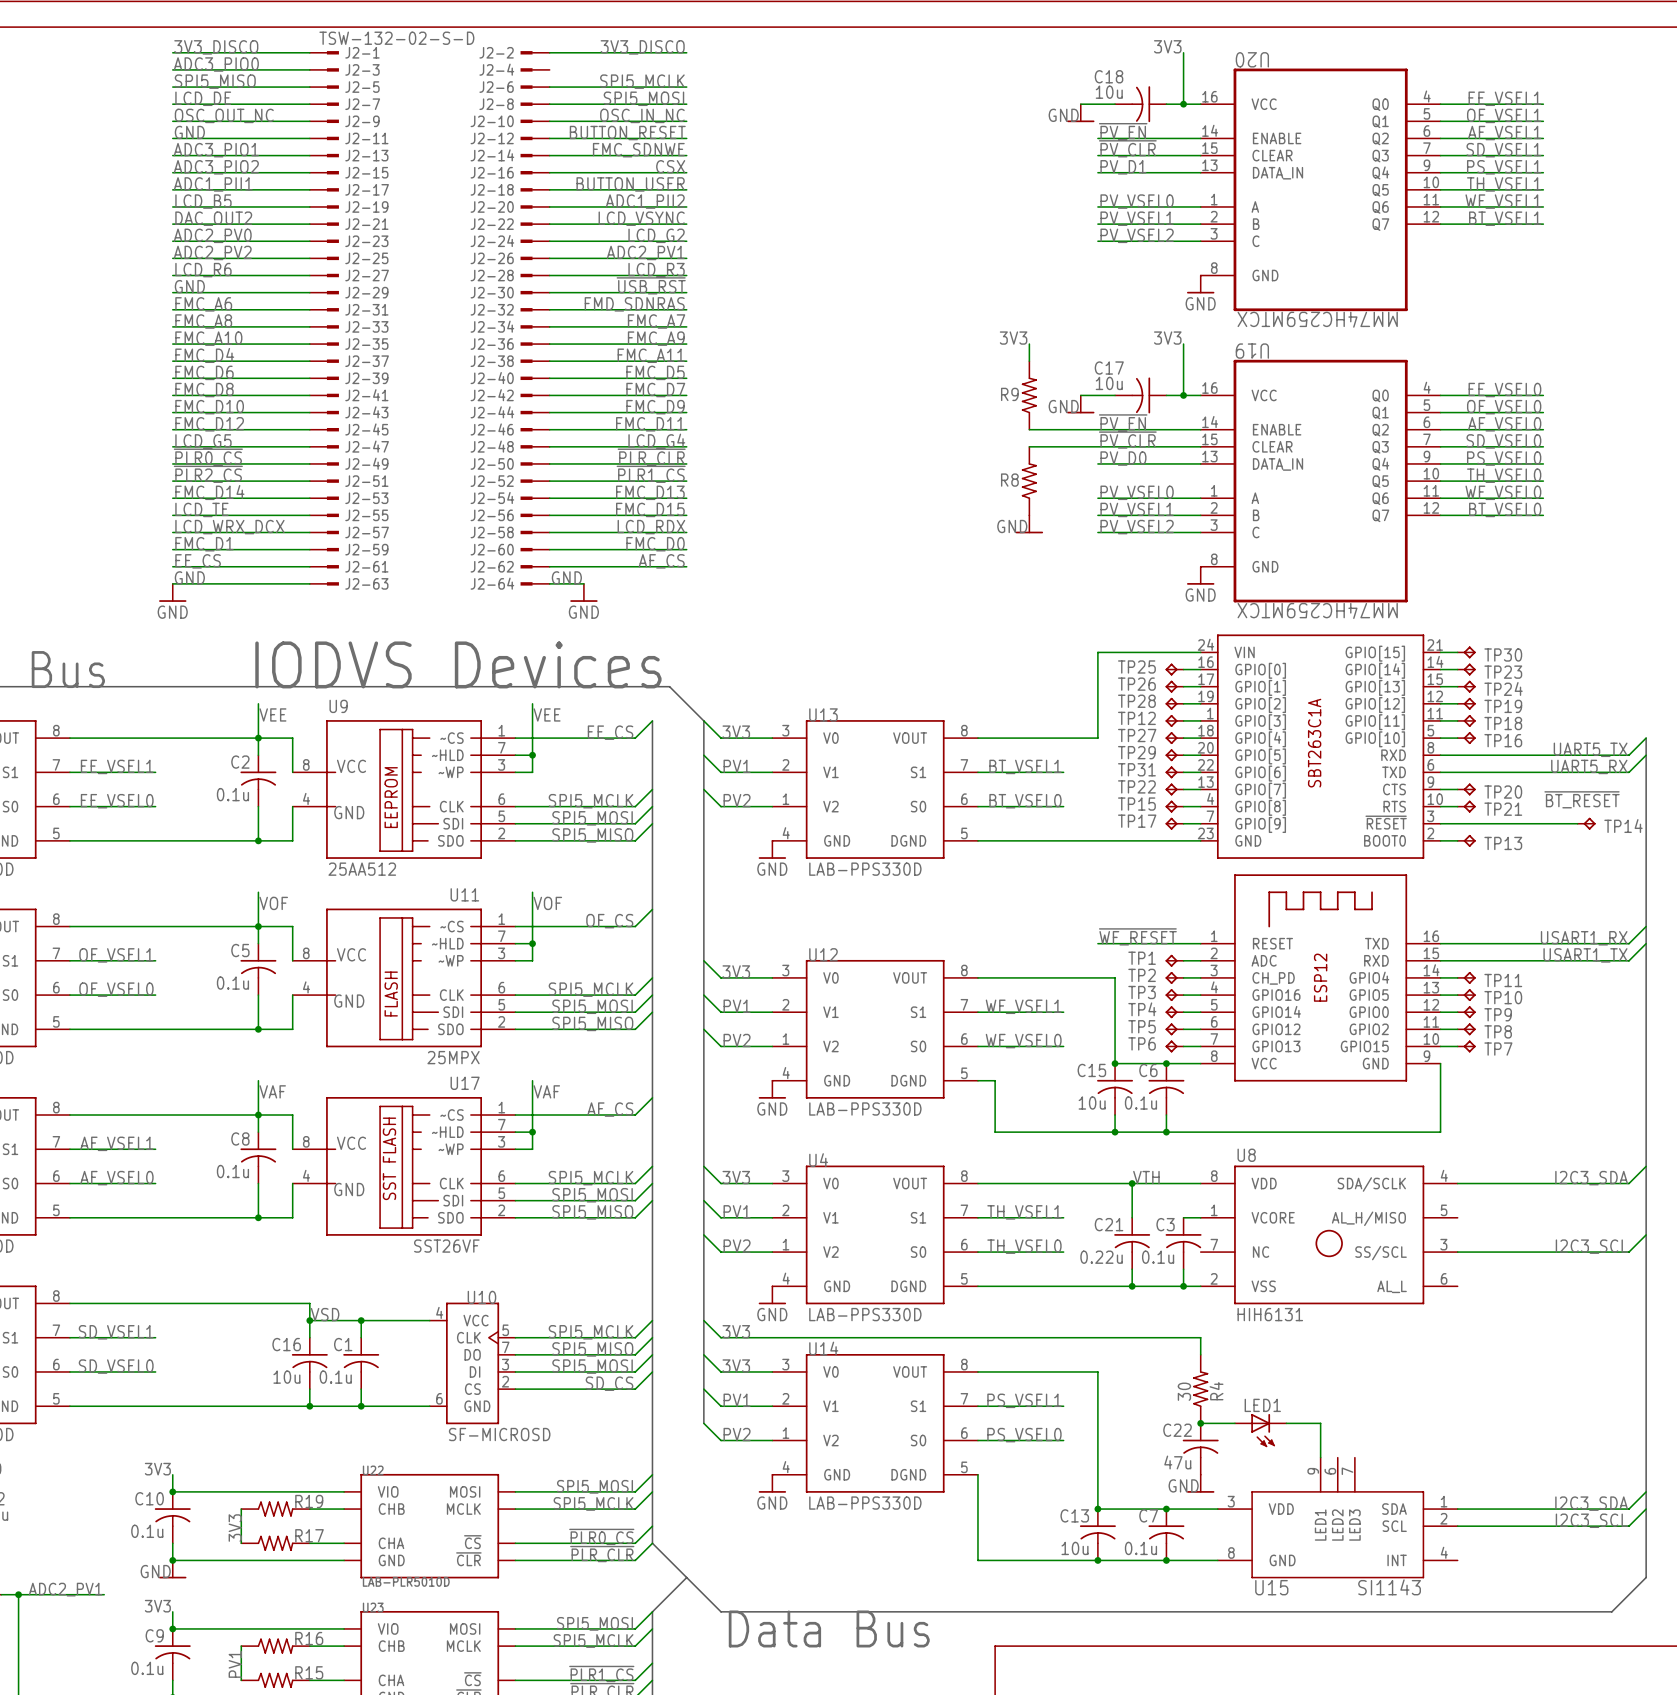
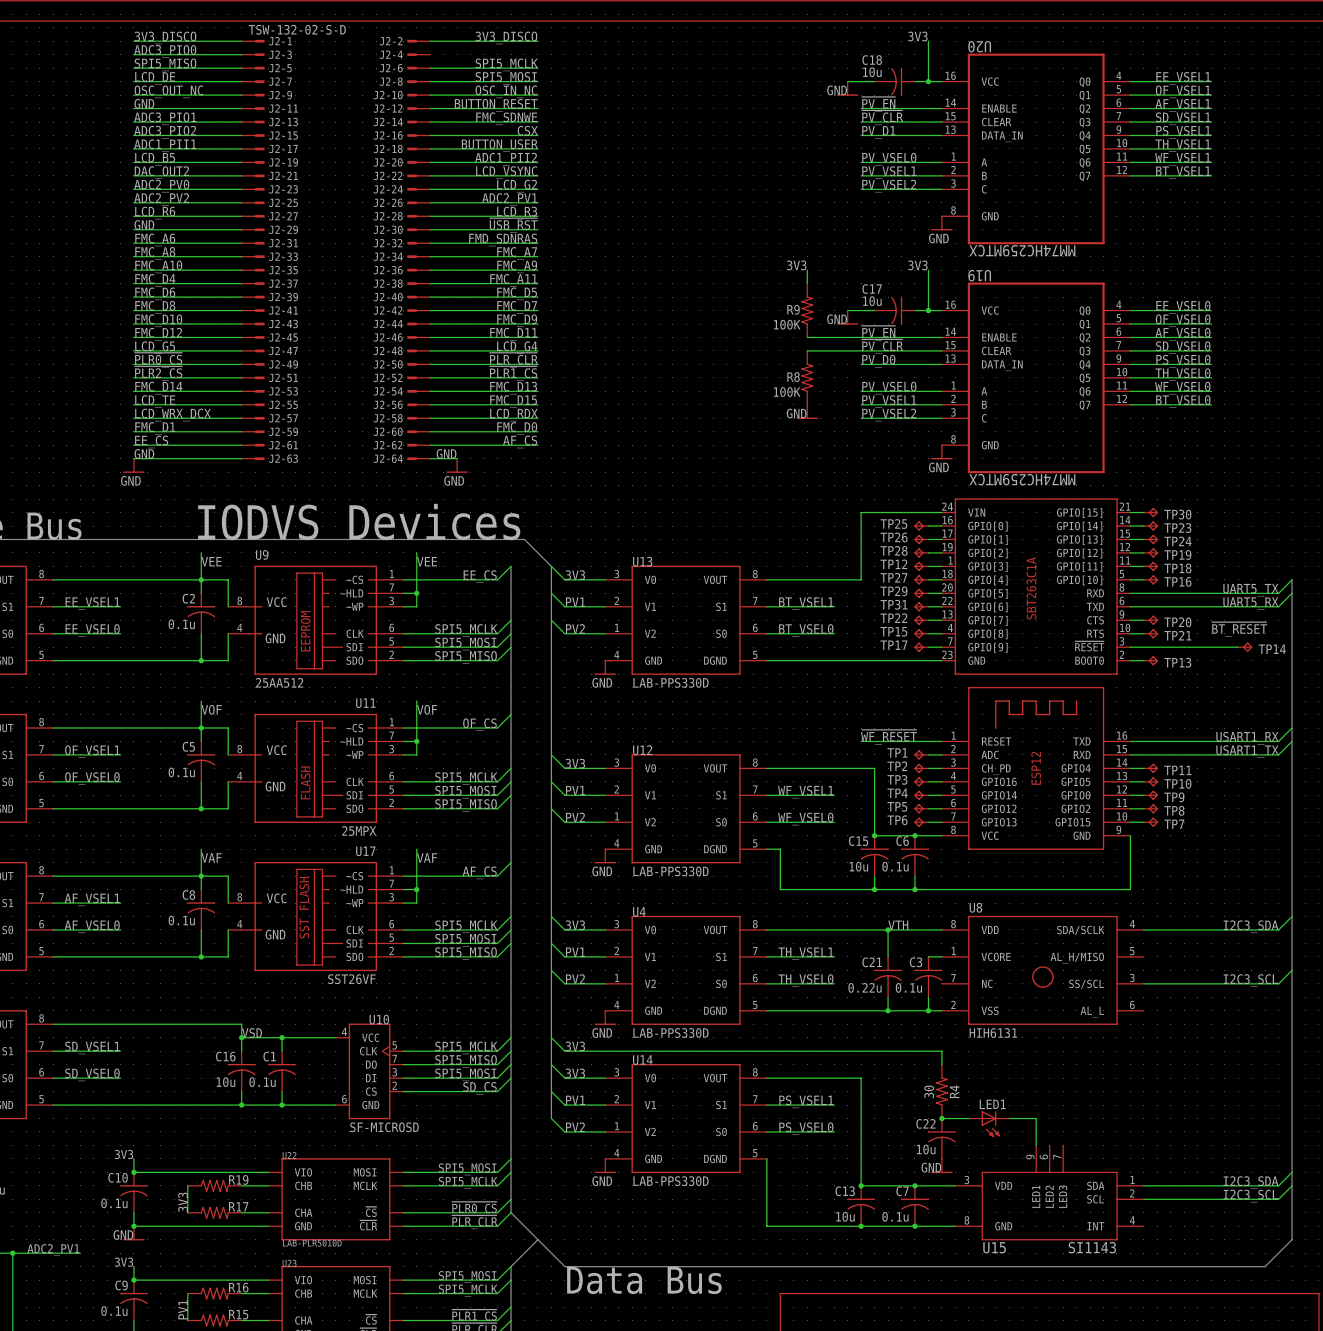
R9 value: none -> 100K (787, 324)
R8 value: none -> 100K (787, 392)
C22 value: 47u (1177, 1462) -> 10u (926, 1149)

